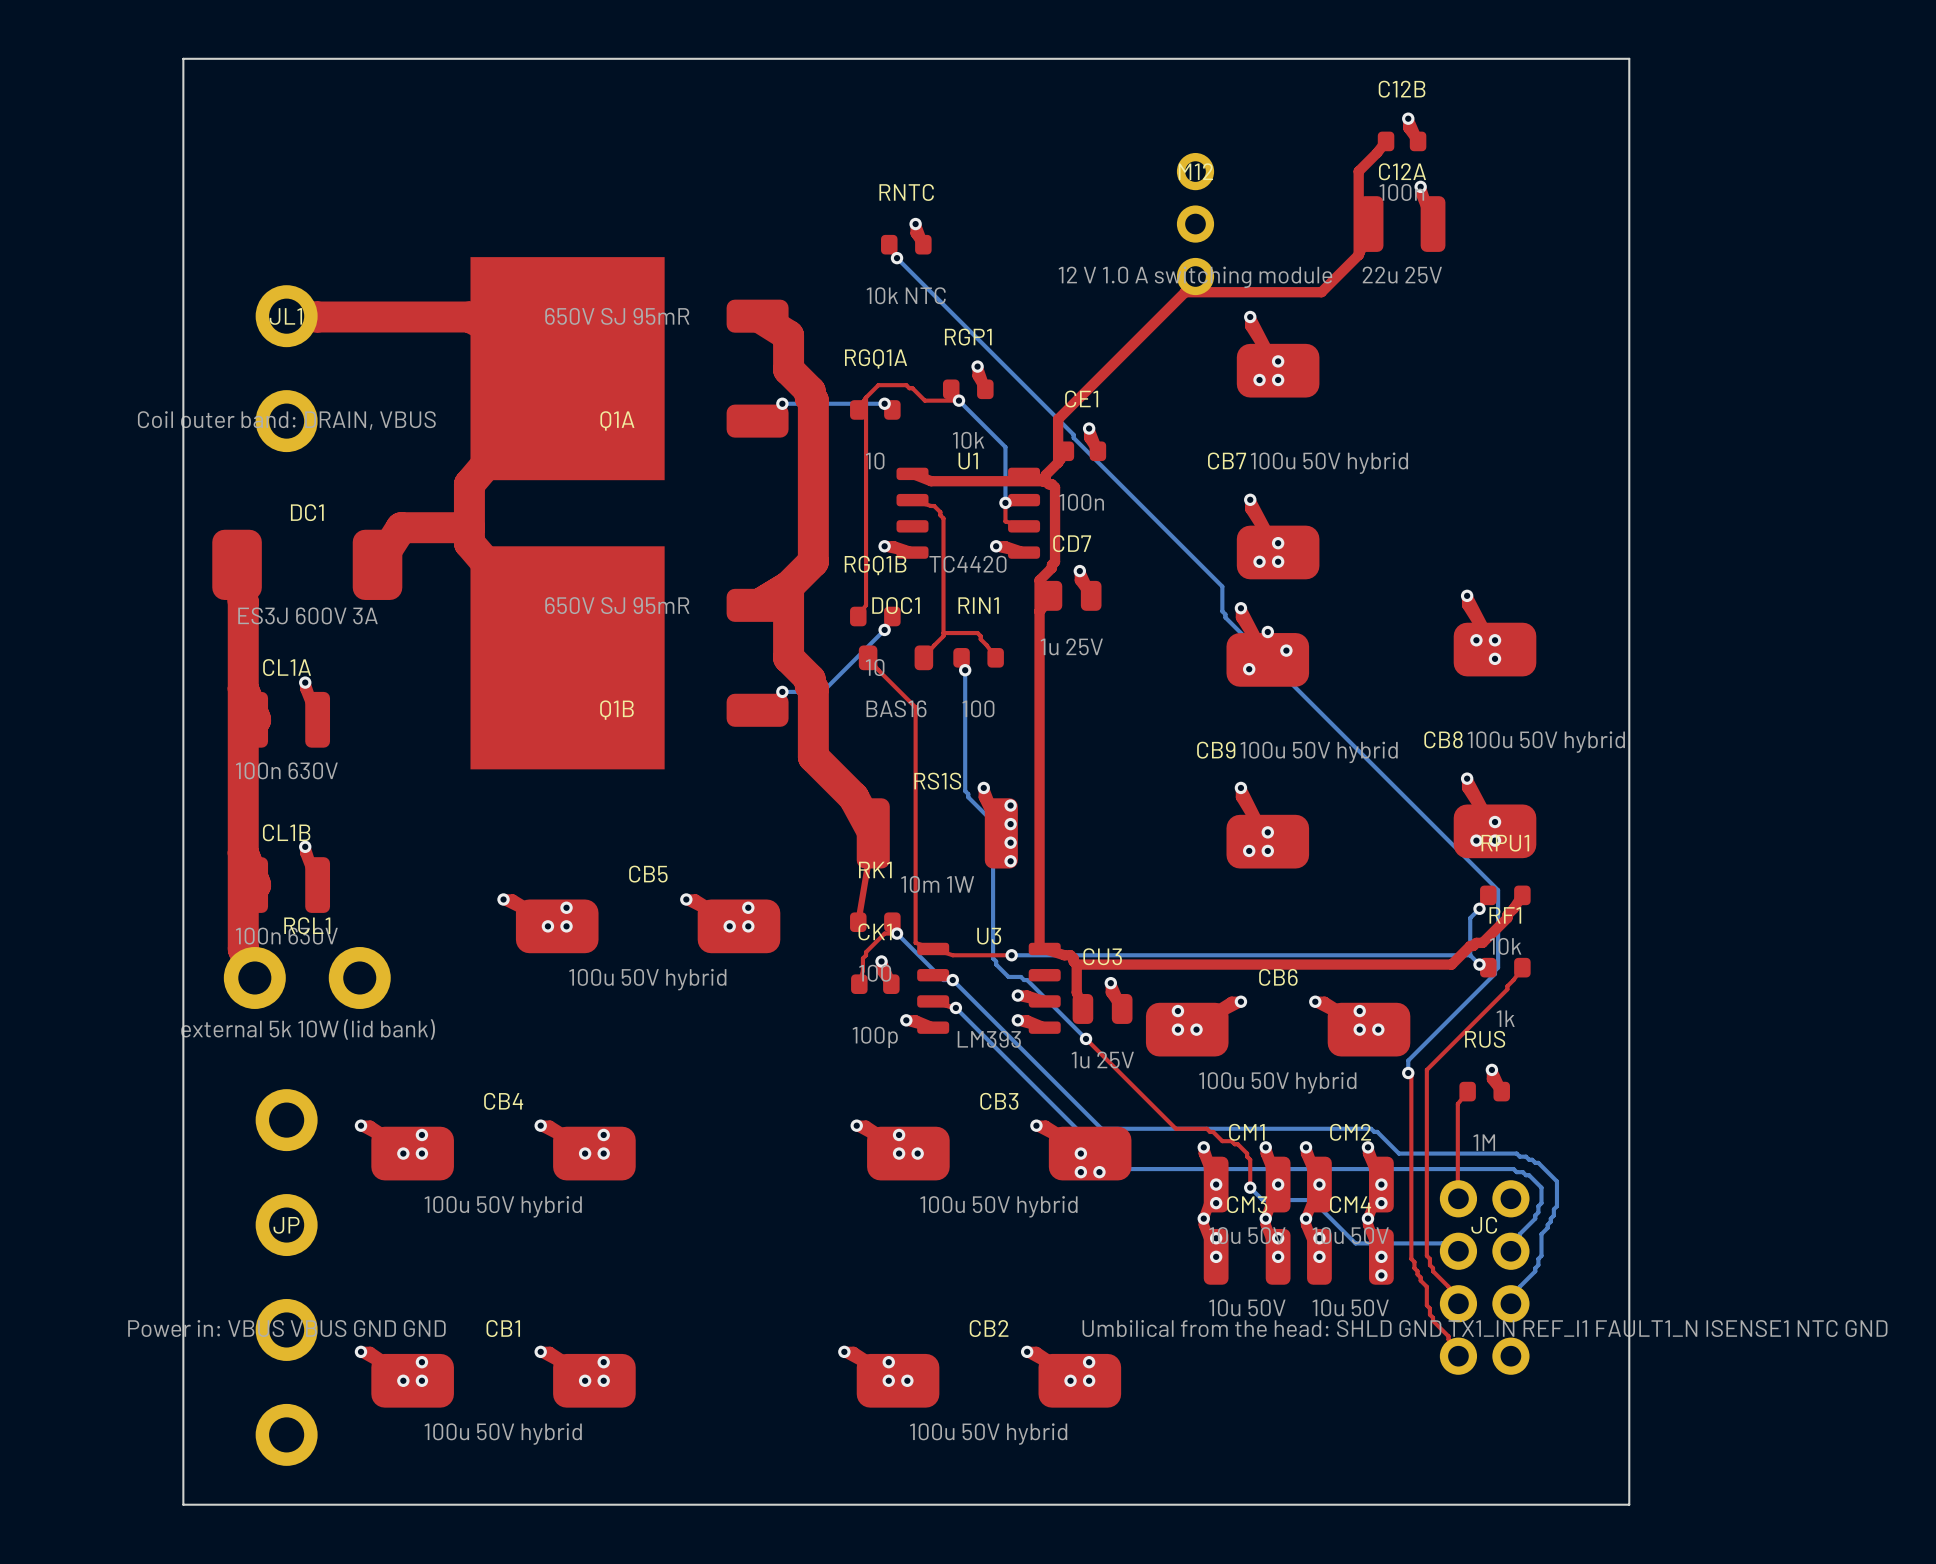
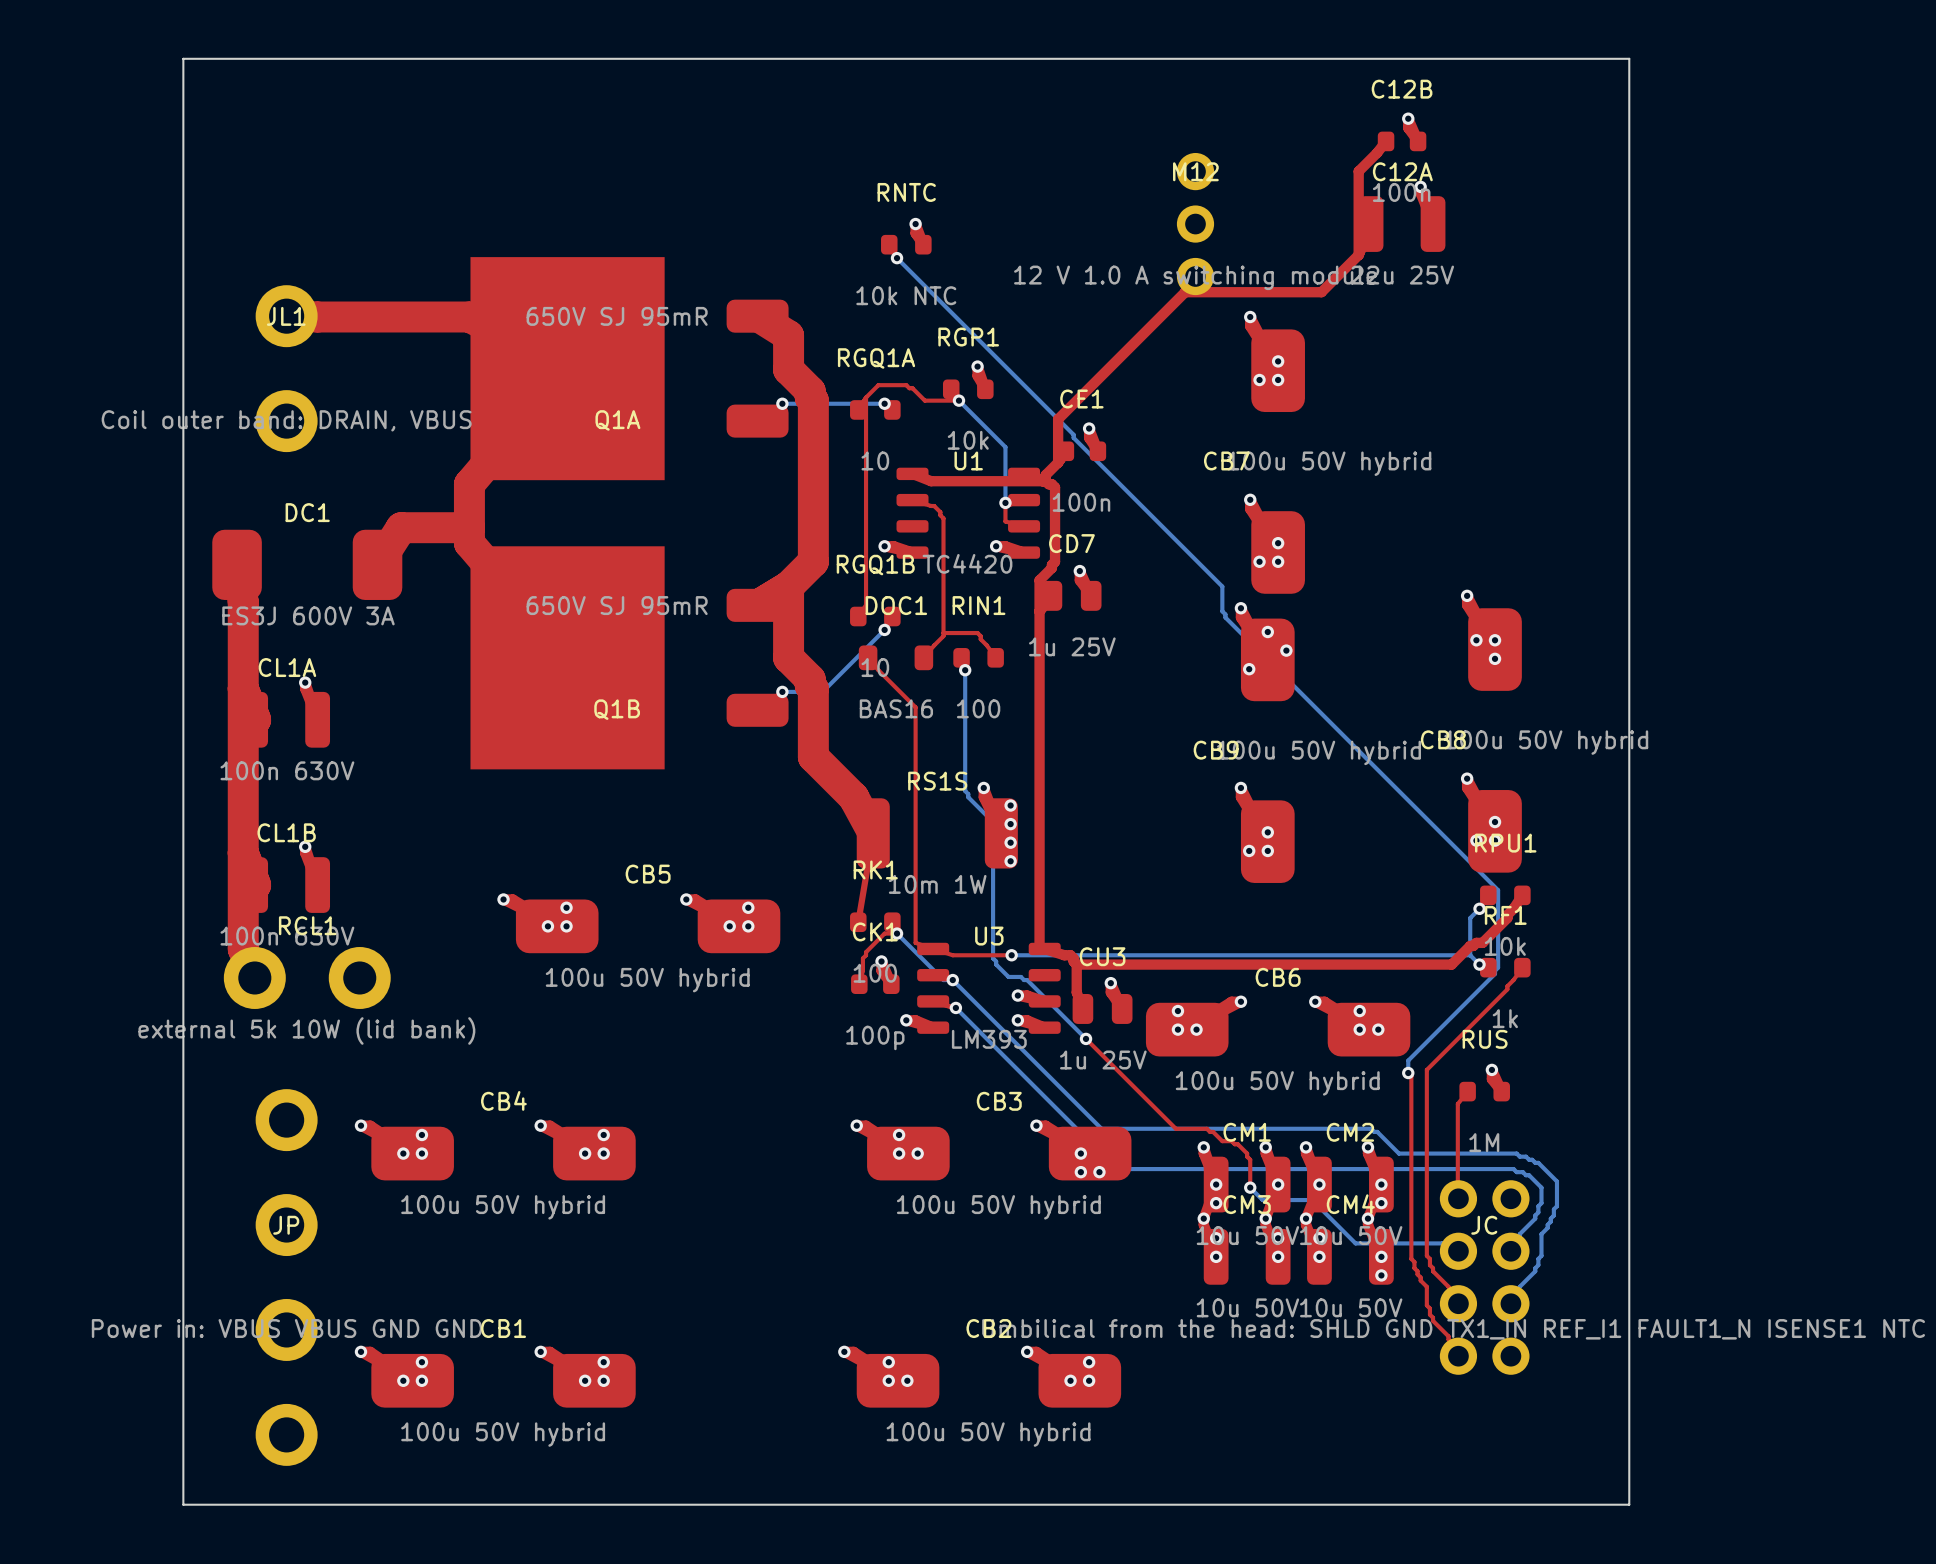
CB7 footprint: [1236, 343, 1320, 580] -> [1251, 329, 1305, 594]
CB8 footprint: [1453, 622, 1537, 859] -> [1468, 608, 1522, 873]
CB9 footprint: [1226, 633, 1310, 869] -> [1240, 618, 1295, 883]

